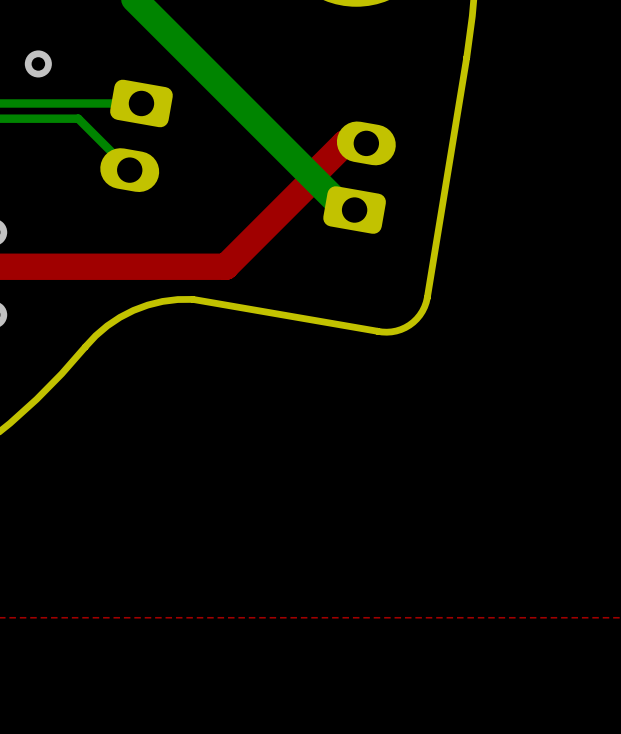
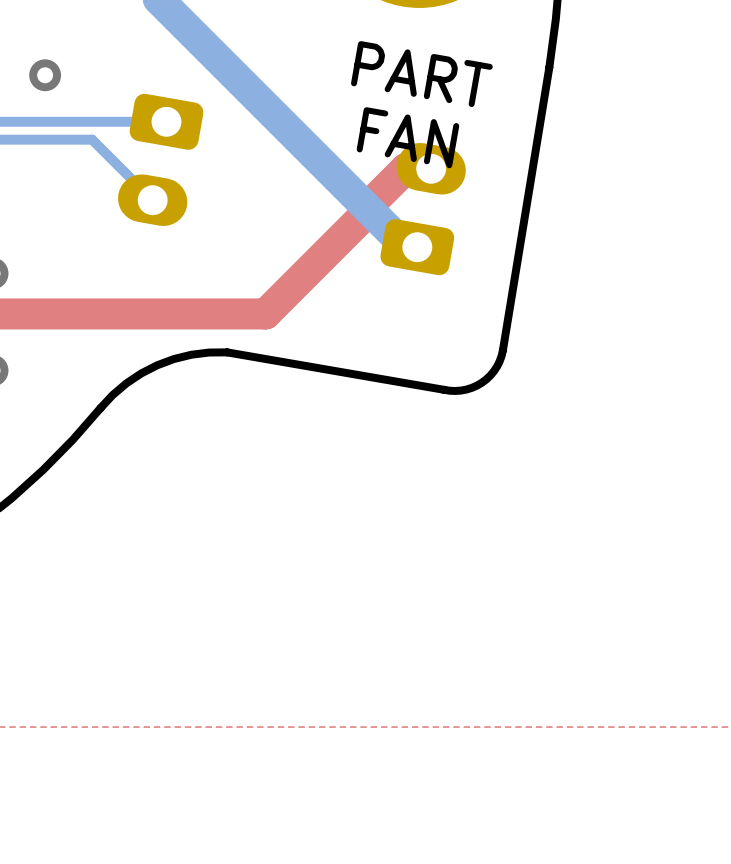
text: none -> PART (421, 74)
text: none -> FAN (407, 137)

